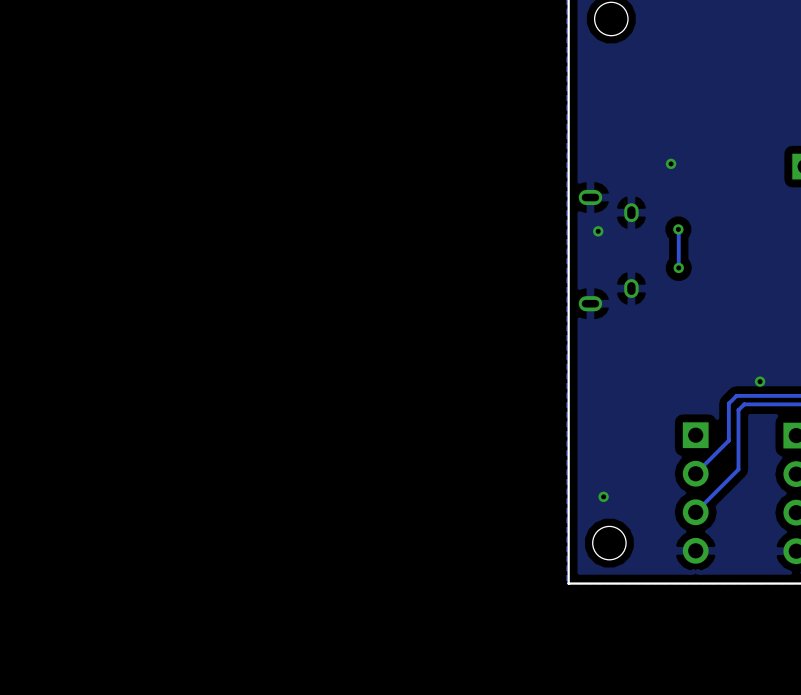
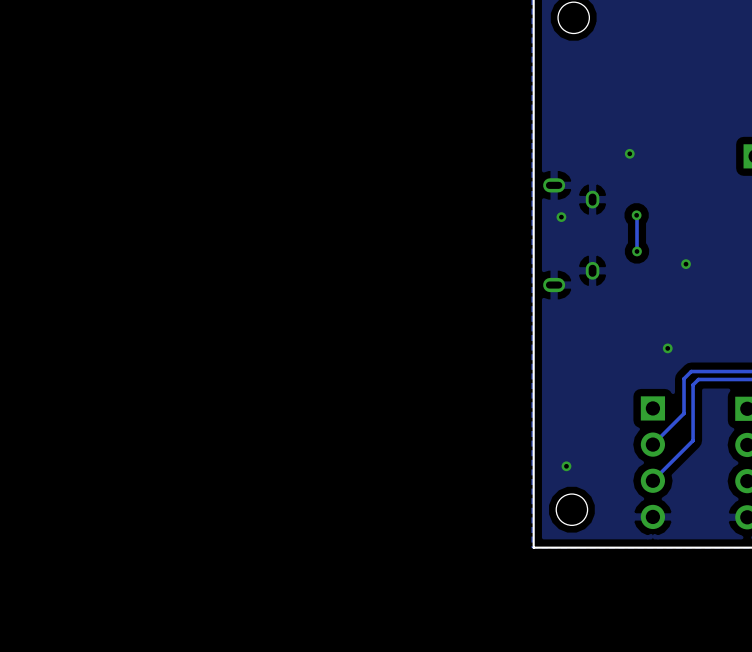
via: none -> (686, 264)
via position: (760, 381) -> (667, 348)

